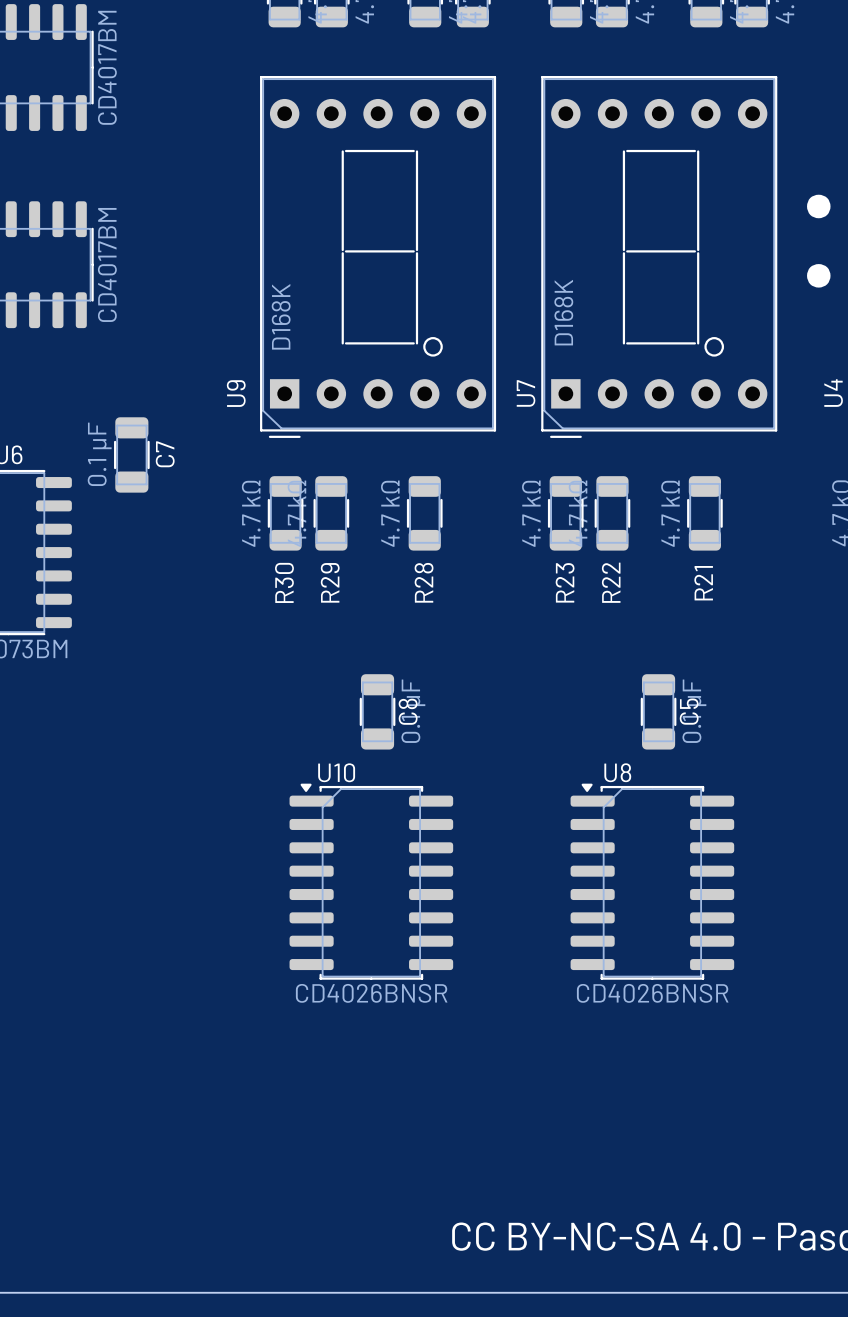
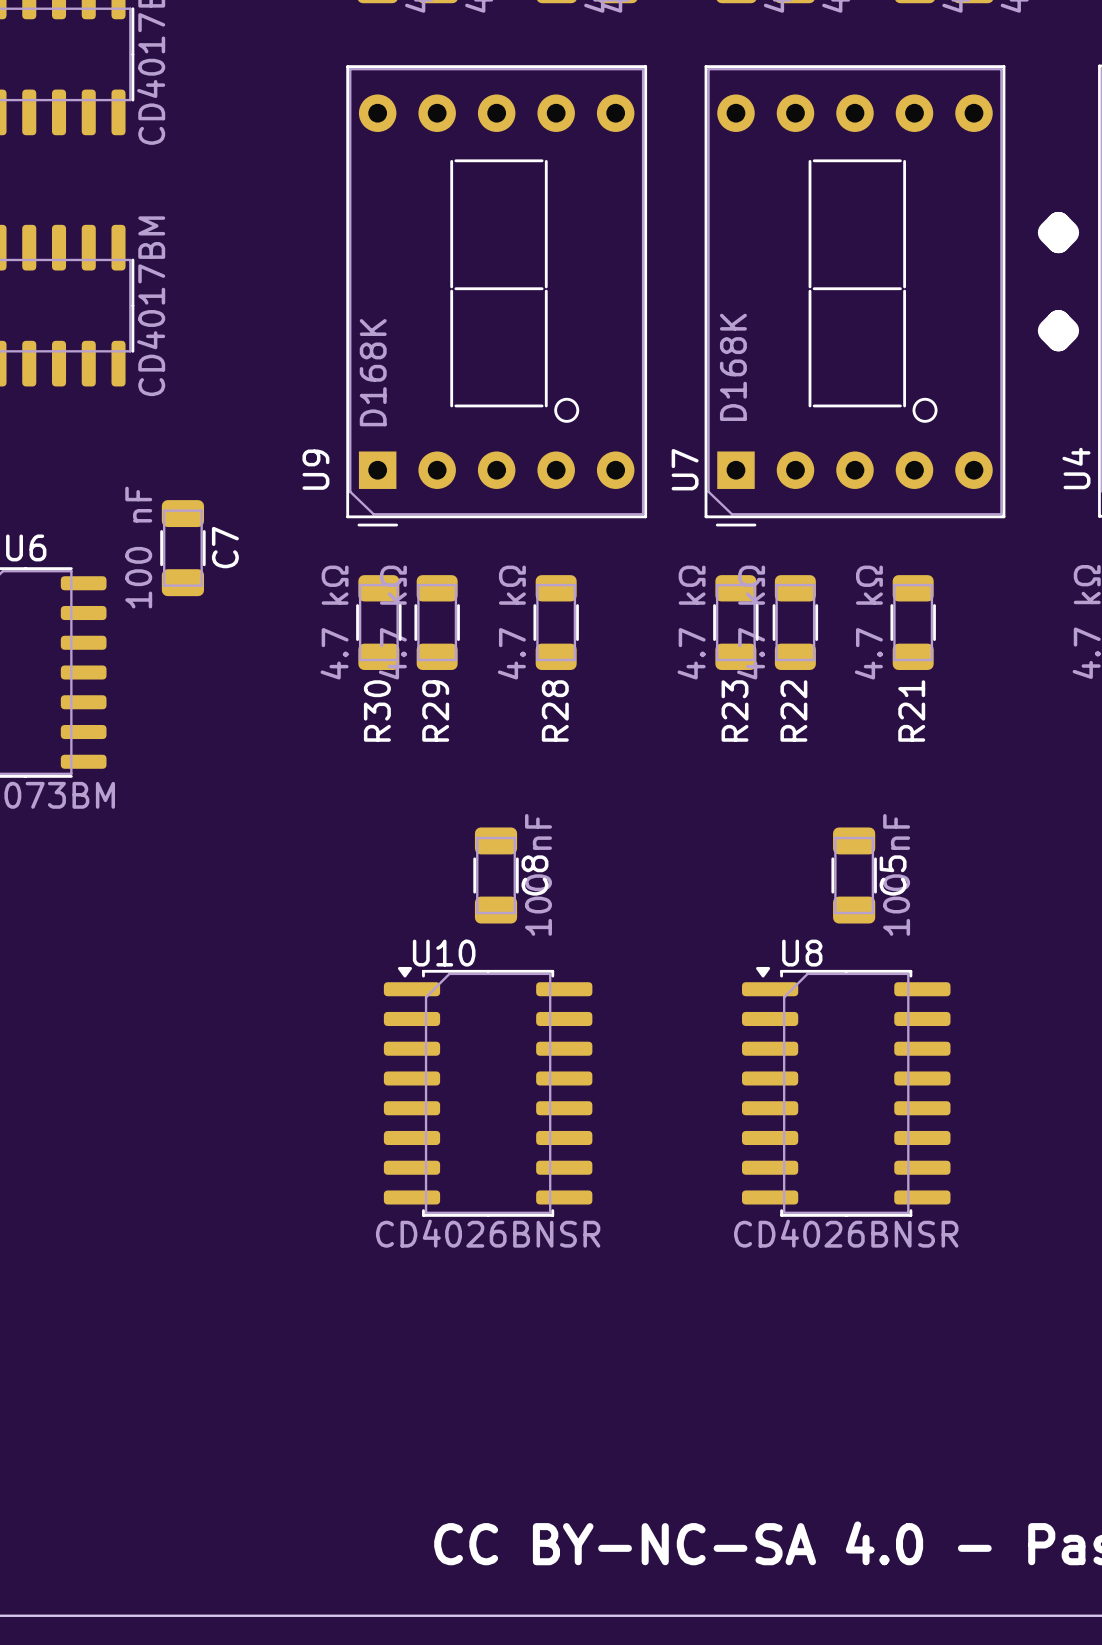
C7 value: 0.1 µF (99, 454) -> 100 nF (138, 547)
C8 value: 0.1 µF (413, 711) -> 100 nF (538, 874)
C5 value: 0.1 µF (694, 711) -> 100 nF (896, 874)

